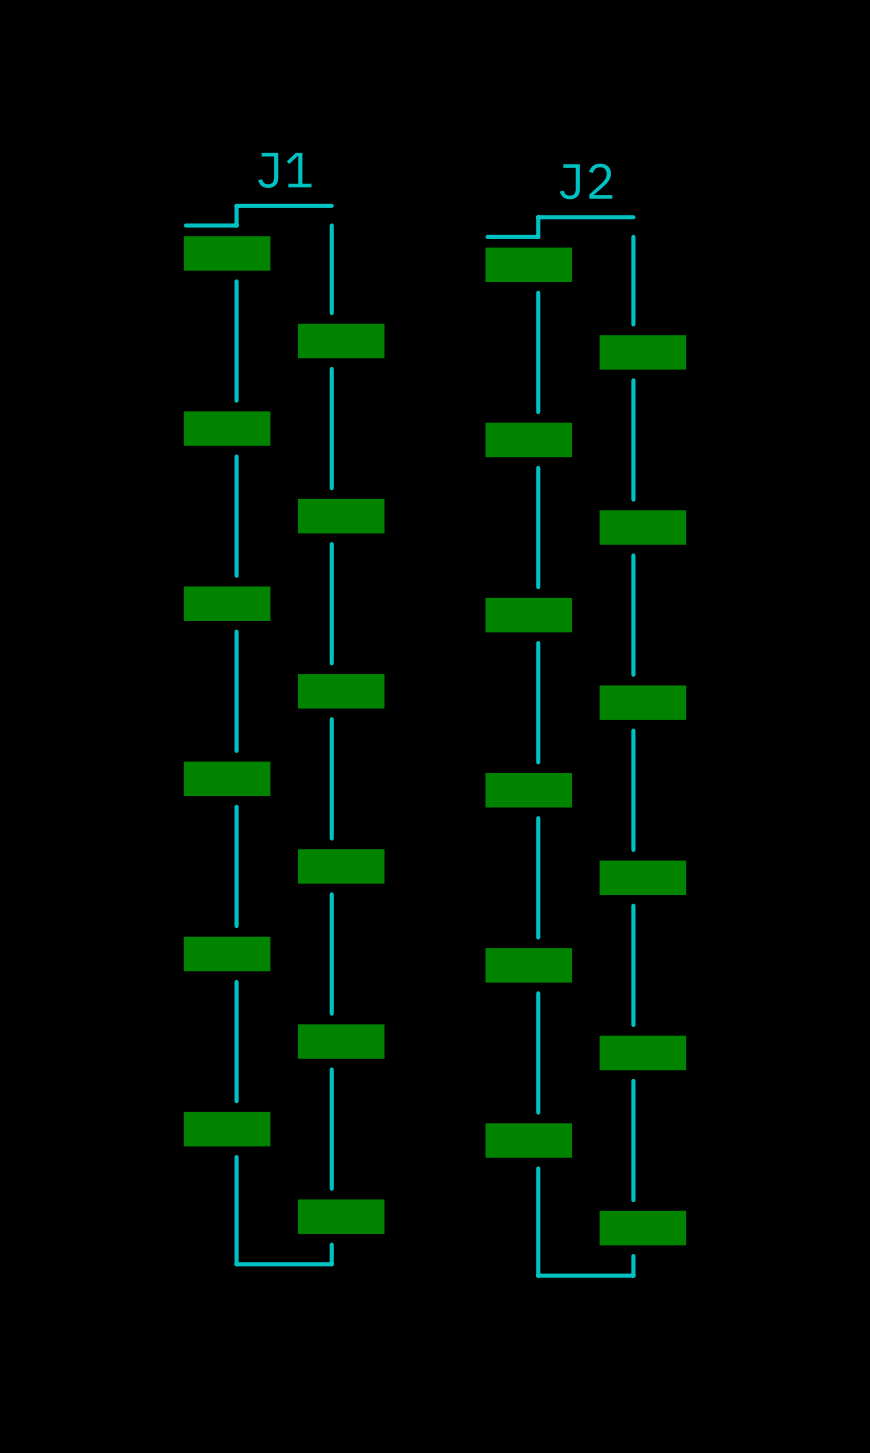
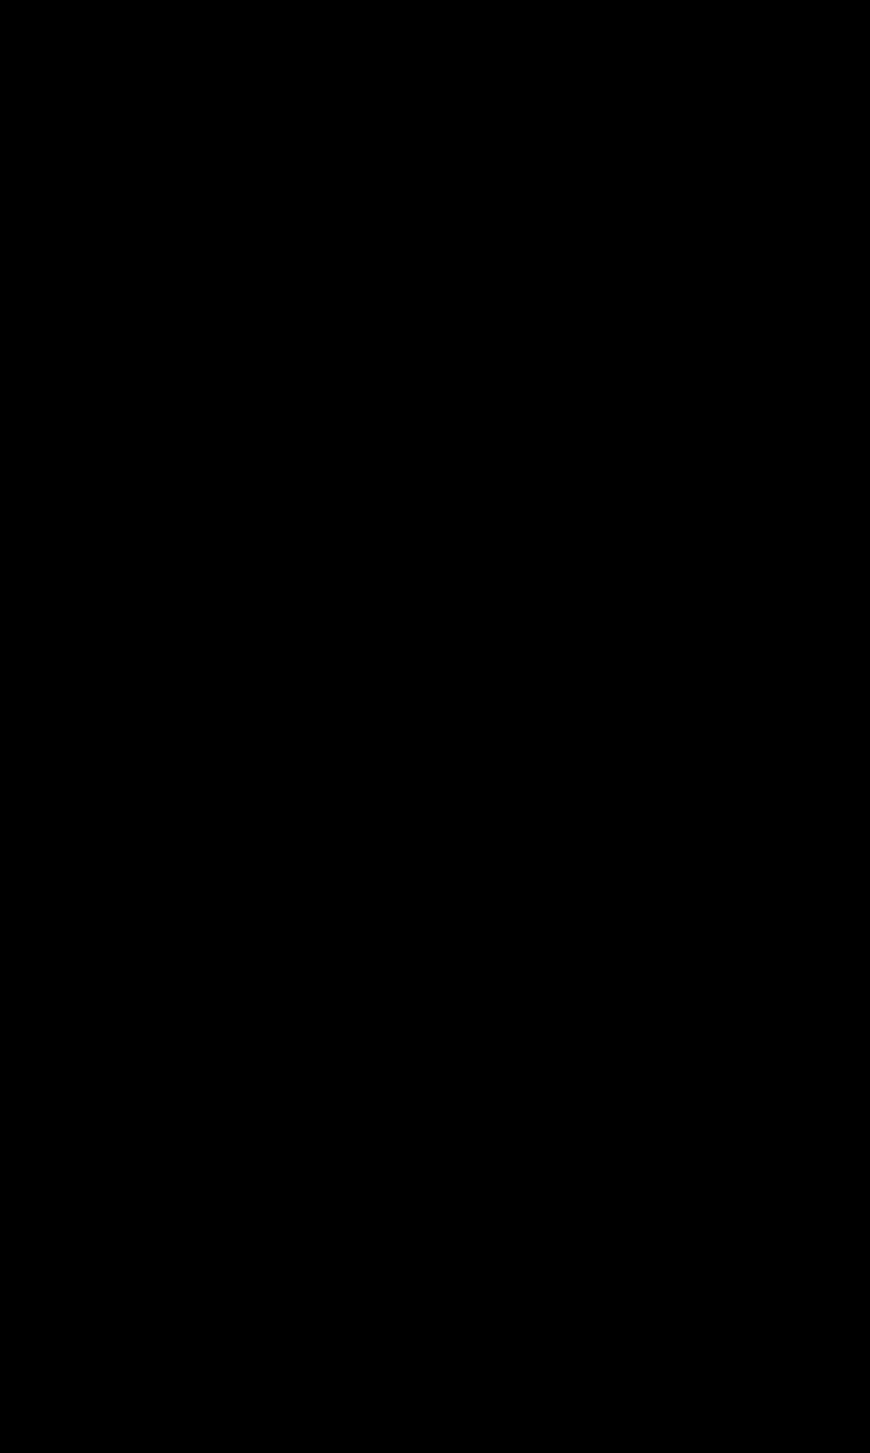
J1: (284, 735) -> none
J2: (585, 746) -> none

